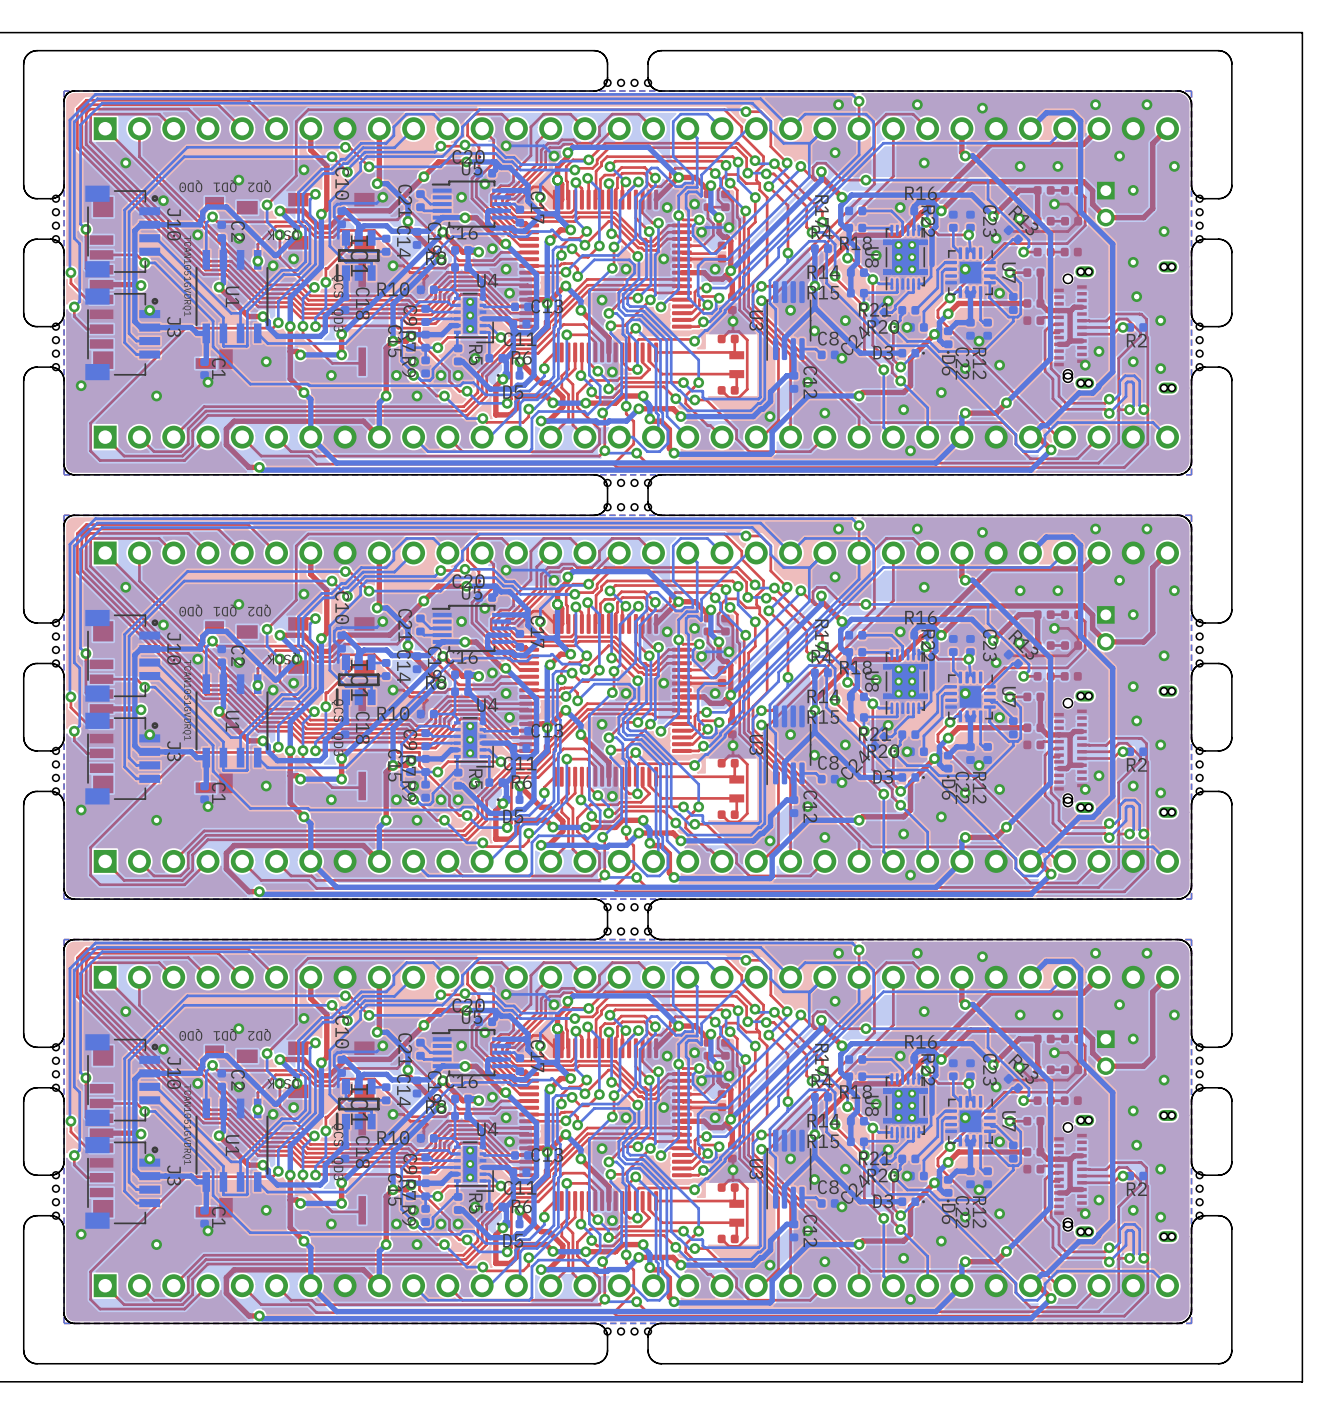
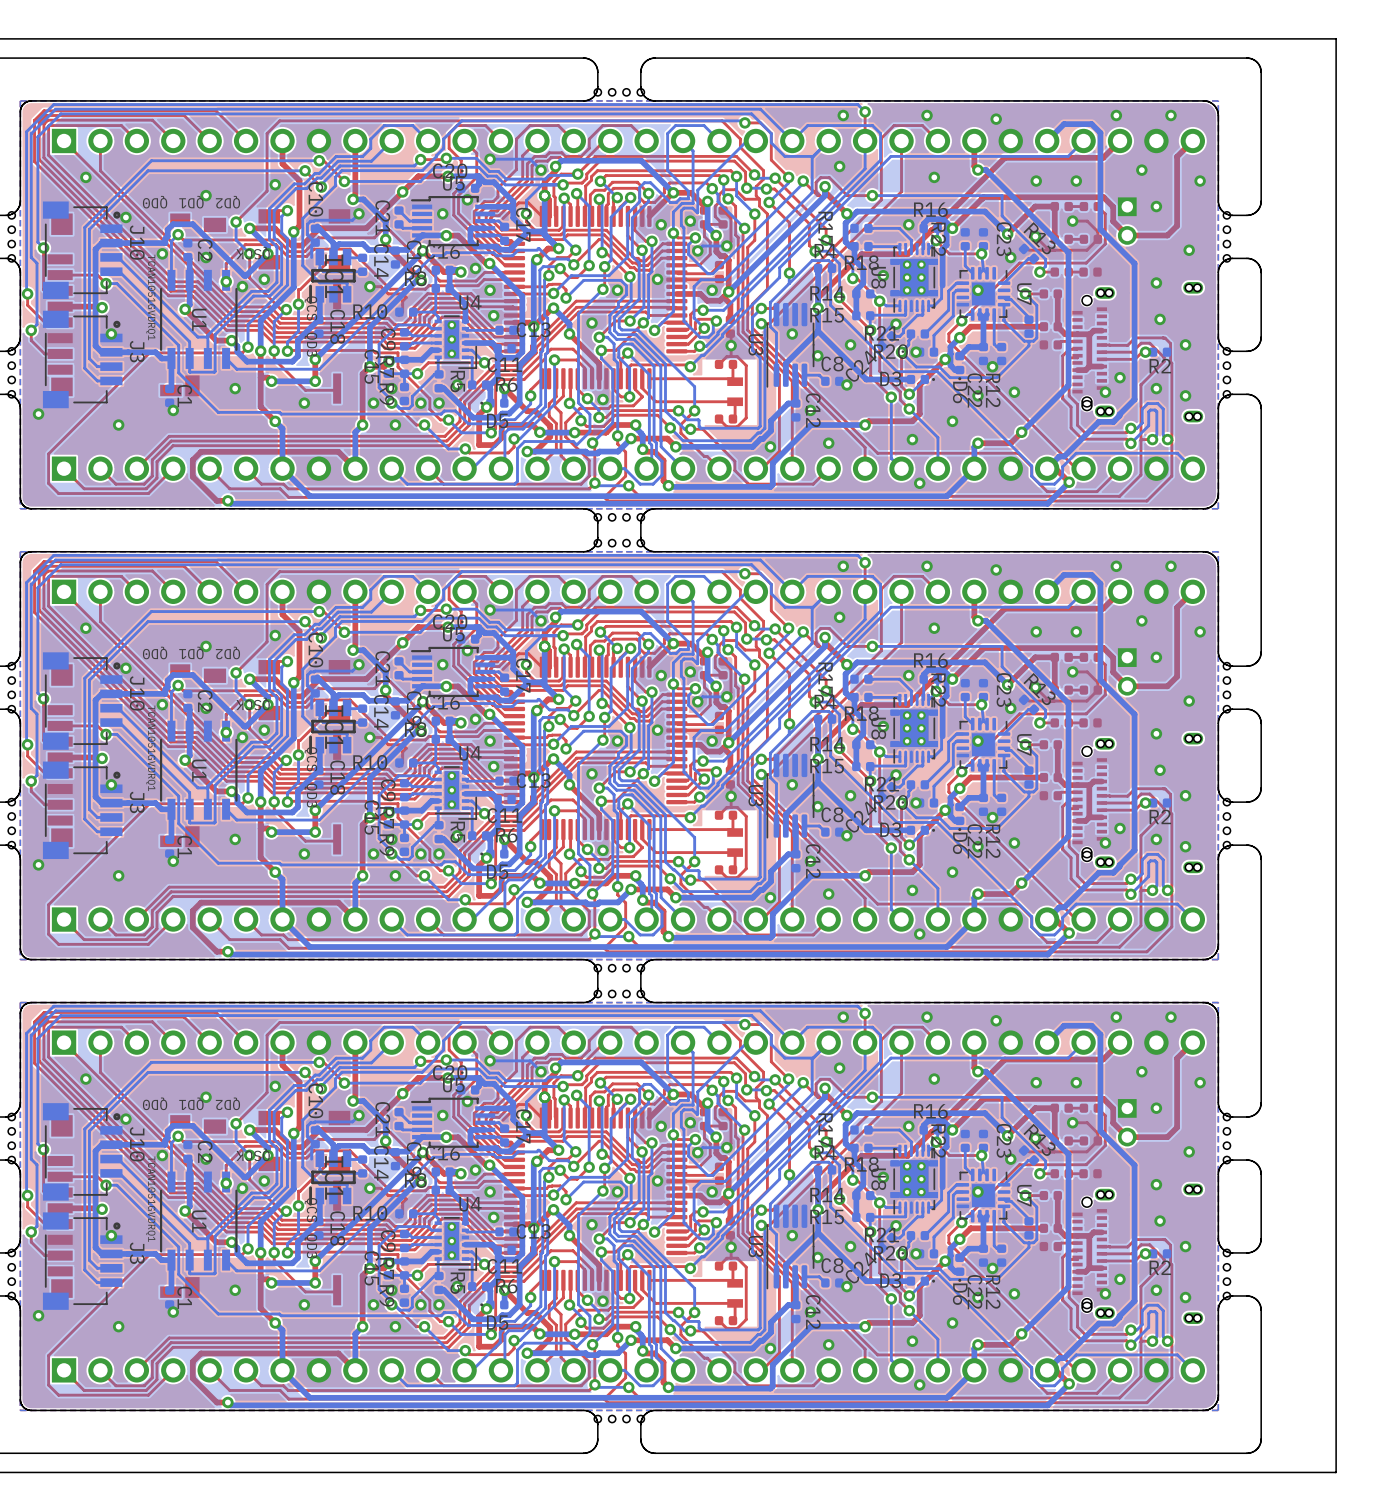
via: (999, 293) -> none
via: (999, 717) -> none
via: (999, 1141) -> none

